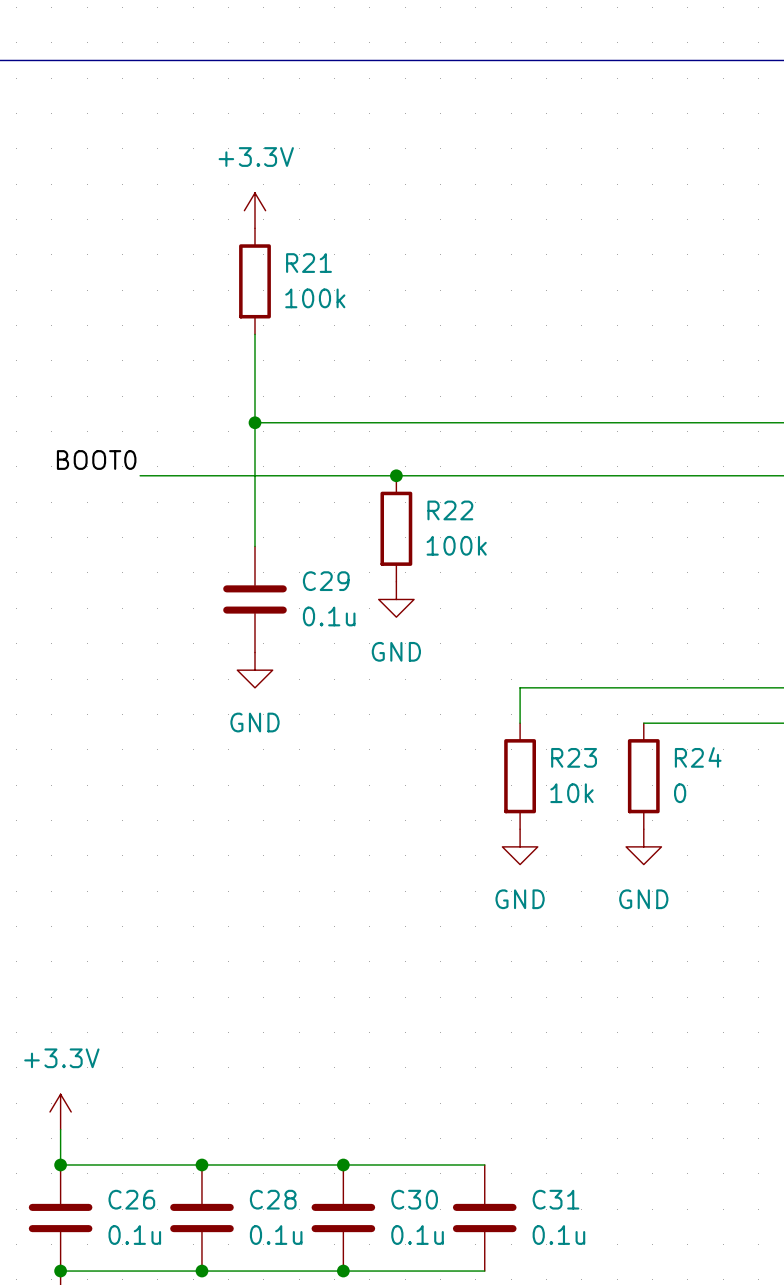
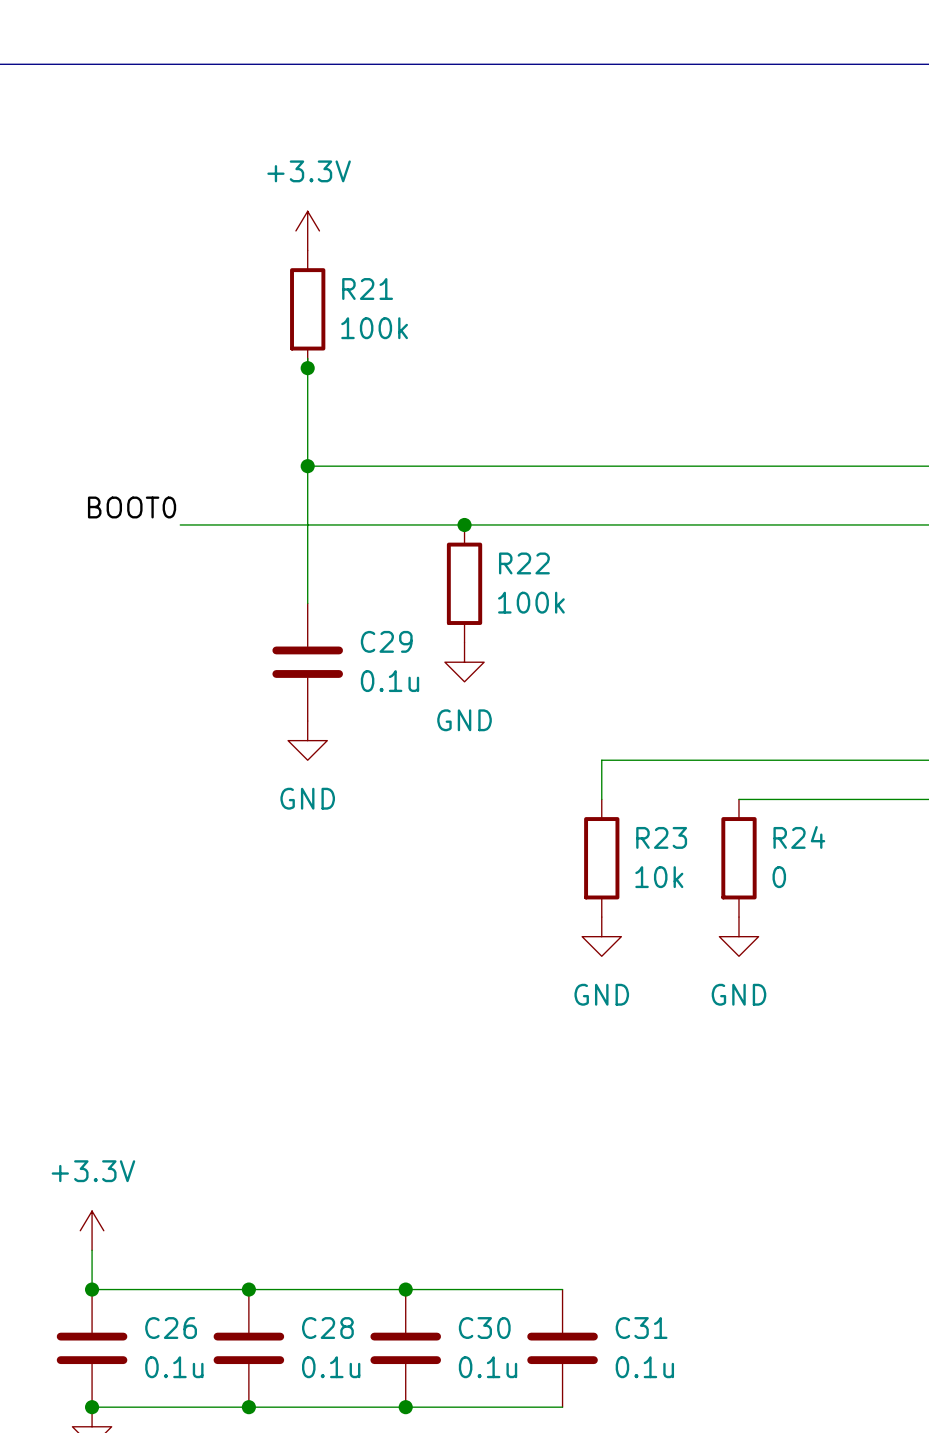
junction: none -> (307, 368)

